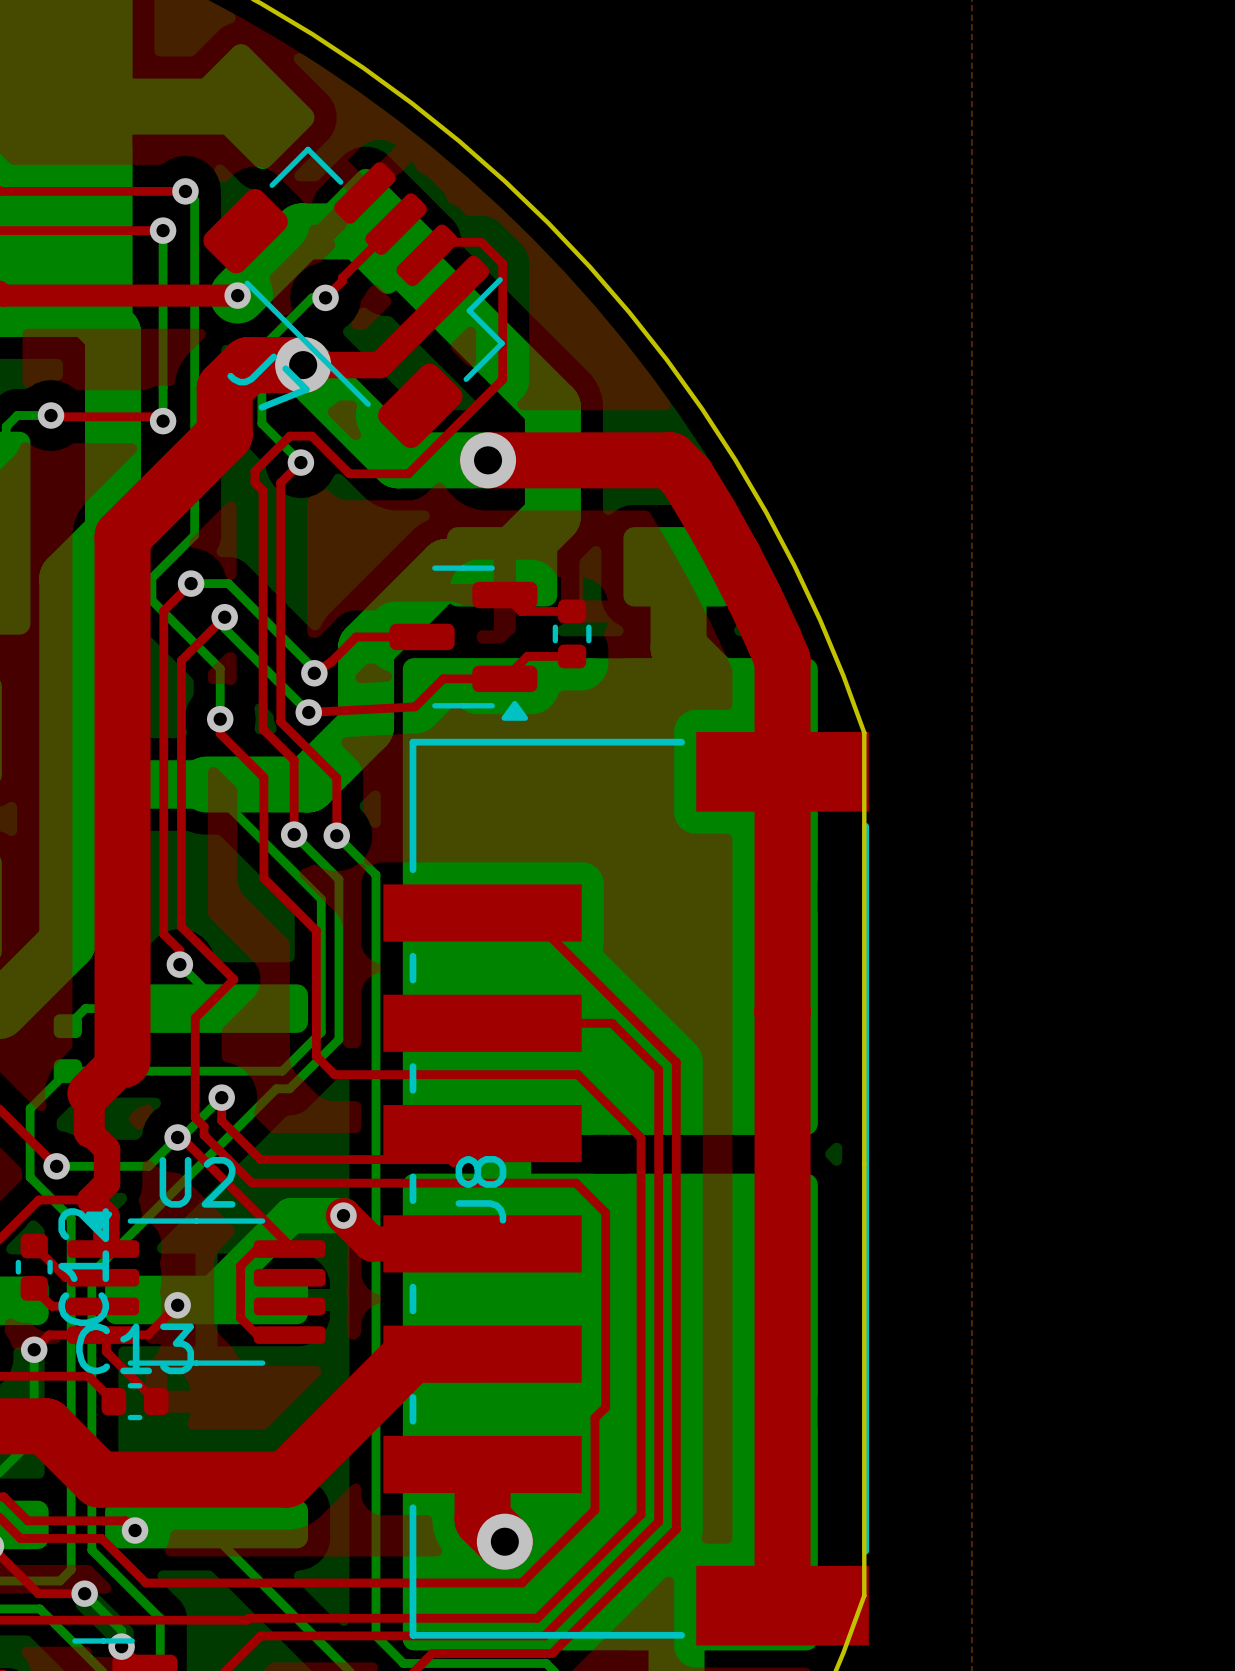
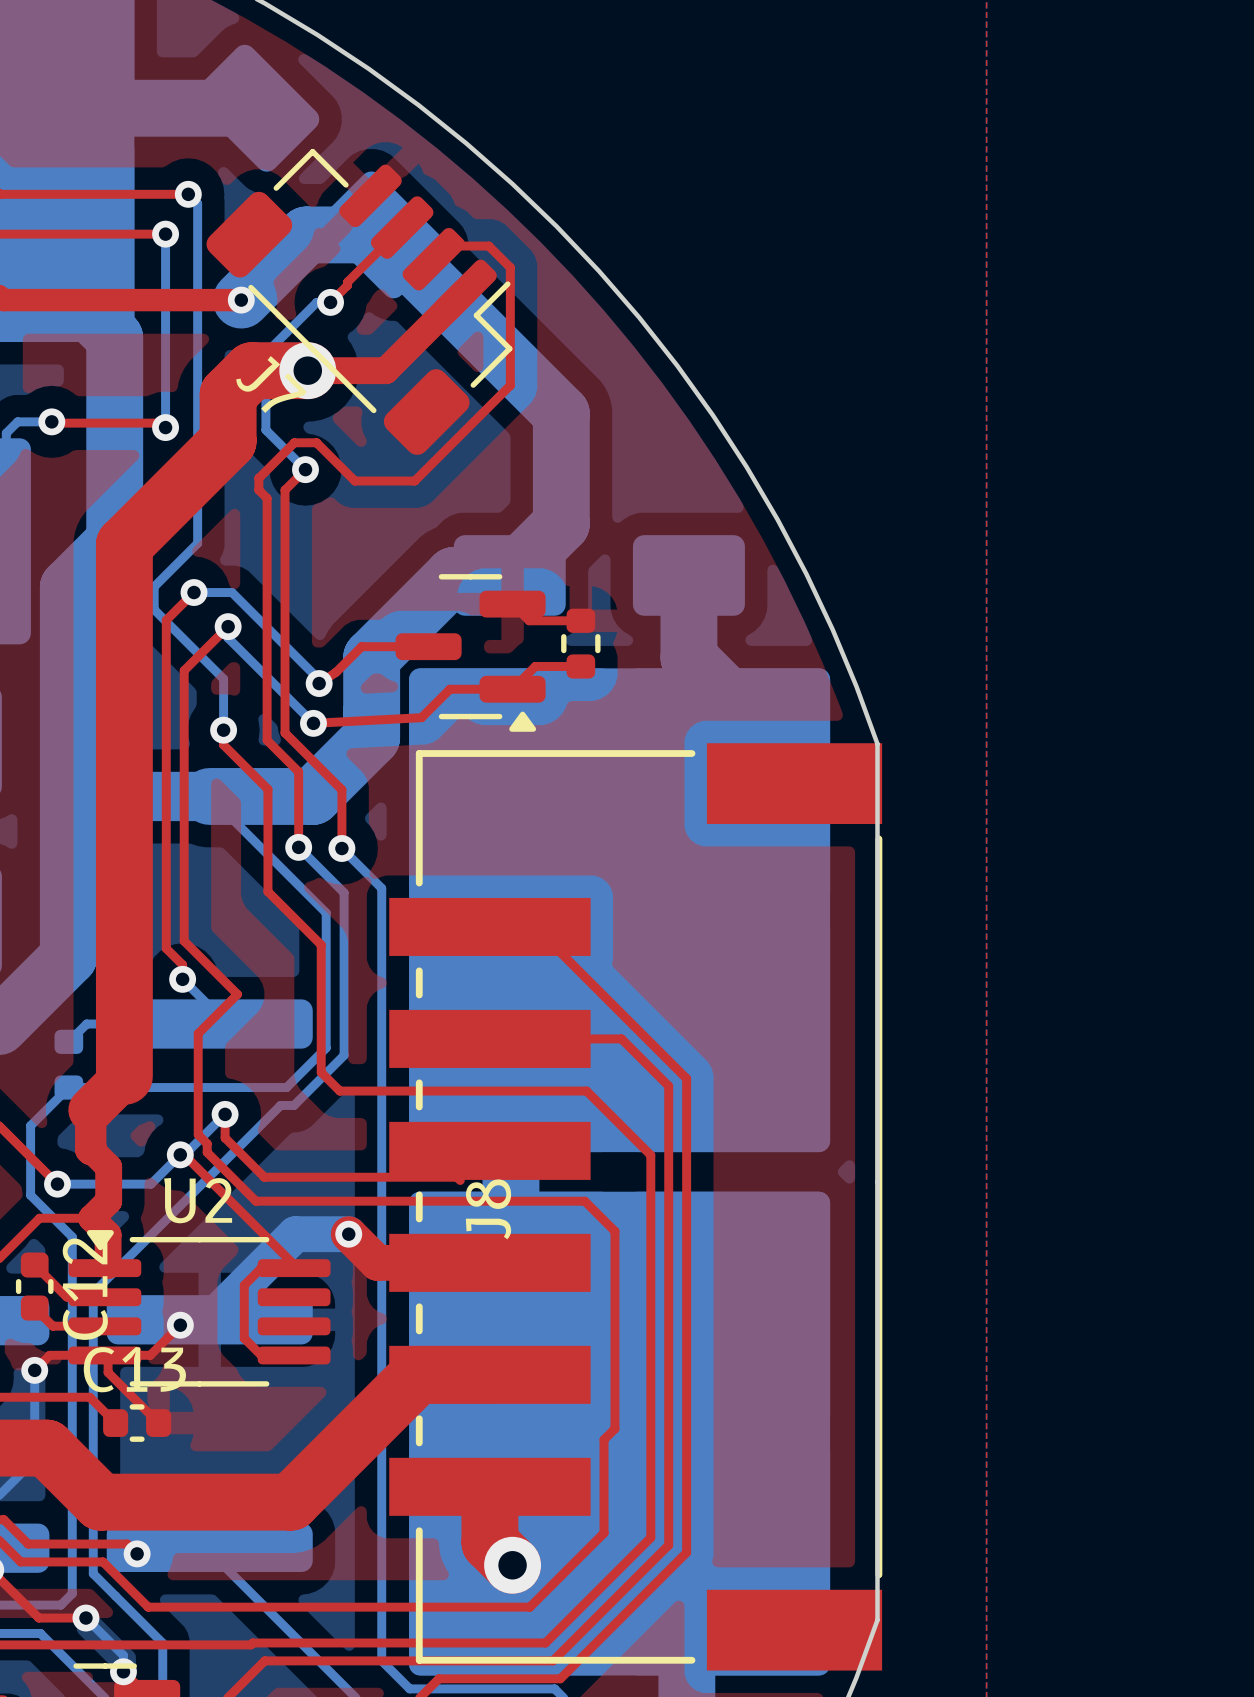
bottom track: (303, 365) (398, 460) (488, 460) -> none
top track: (488, 460) (670, 460) (686, 476) (710, 516) (754, 598) (782, 660) (782, 1605) -> none
via: (488, 460) -> none

